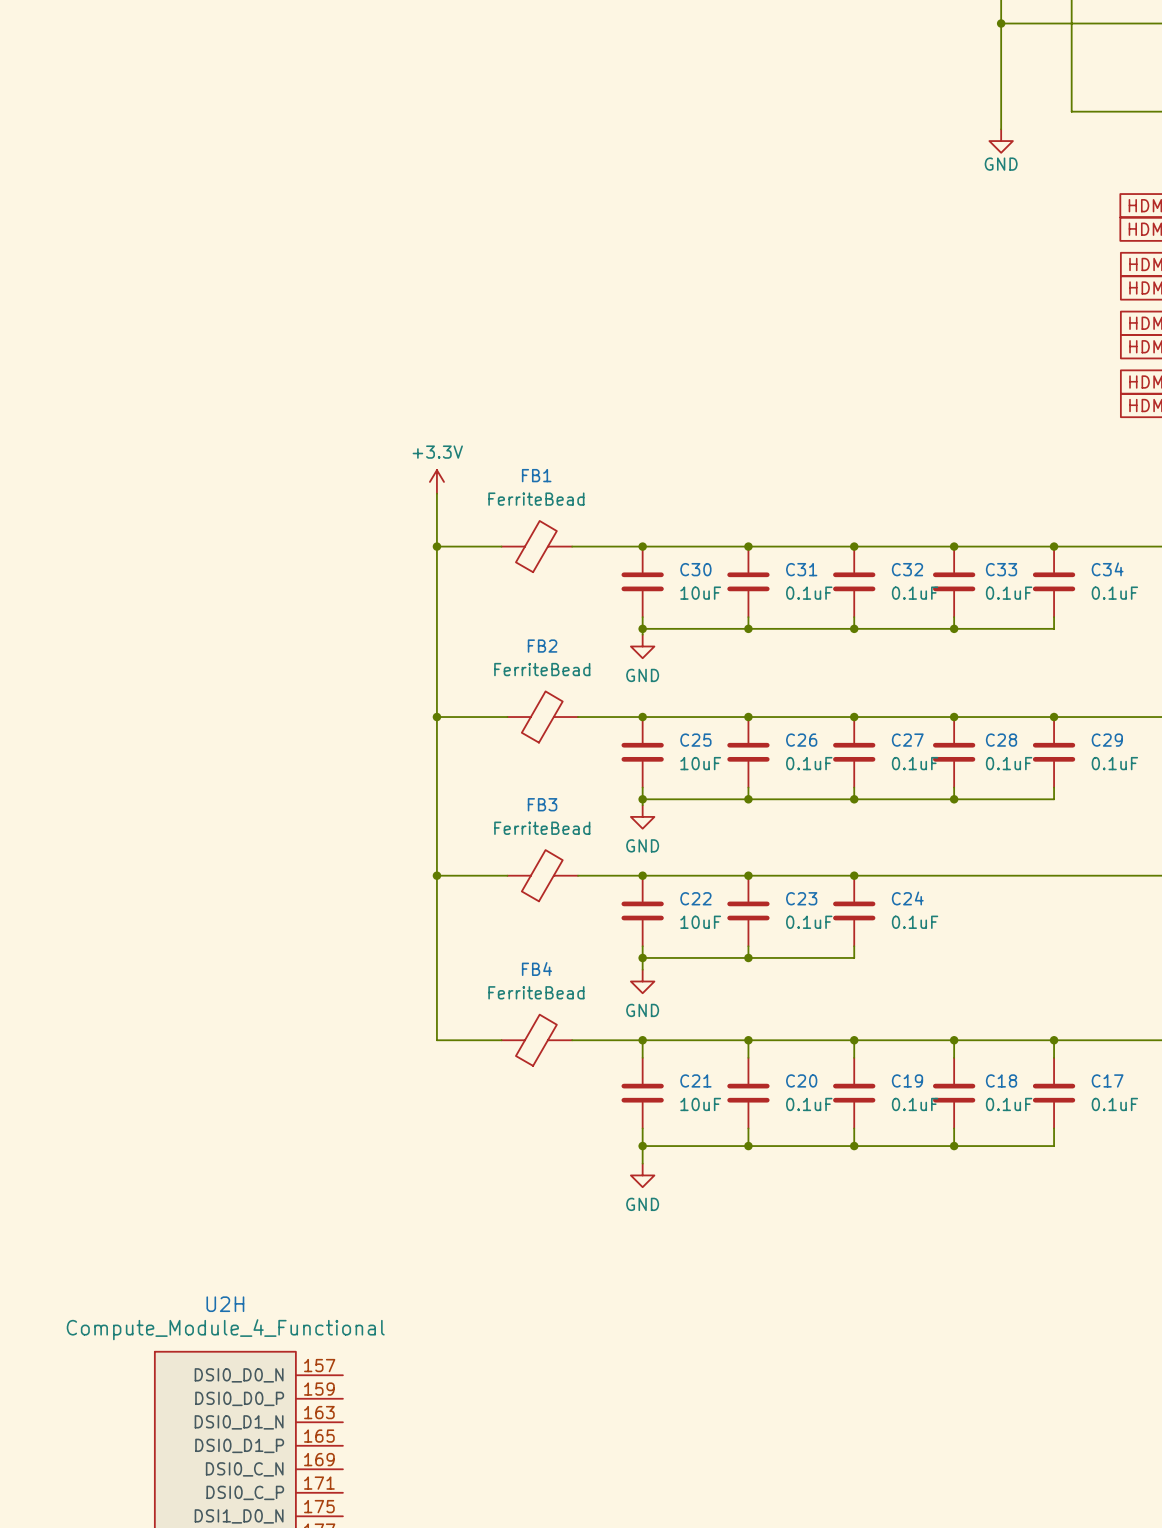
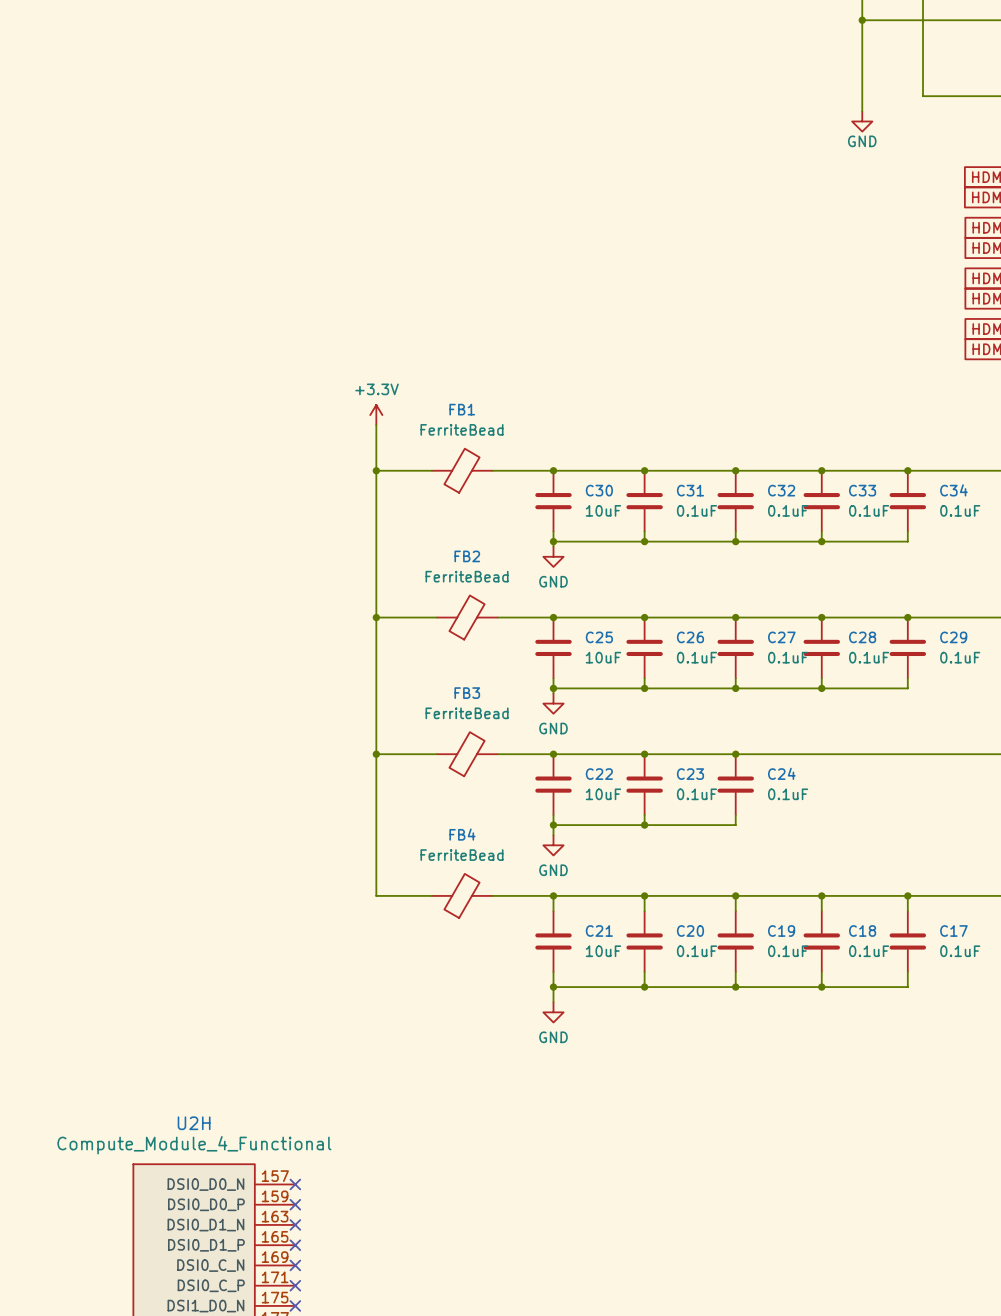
no-connect mark: none -> (295, 1184)
no-connect mark: none -> (295, 1204)
no-connect mark: none -> (295, 1224)
no-connect mark: none -> (295, 1245)
no-connect mark: none -> (295, 1265)
no-connect mark: none -> (295, 1285)
no-connect mark: none -> (295, 1305)

